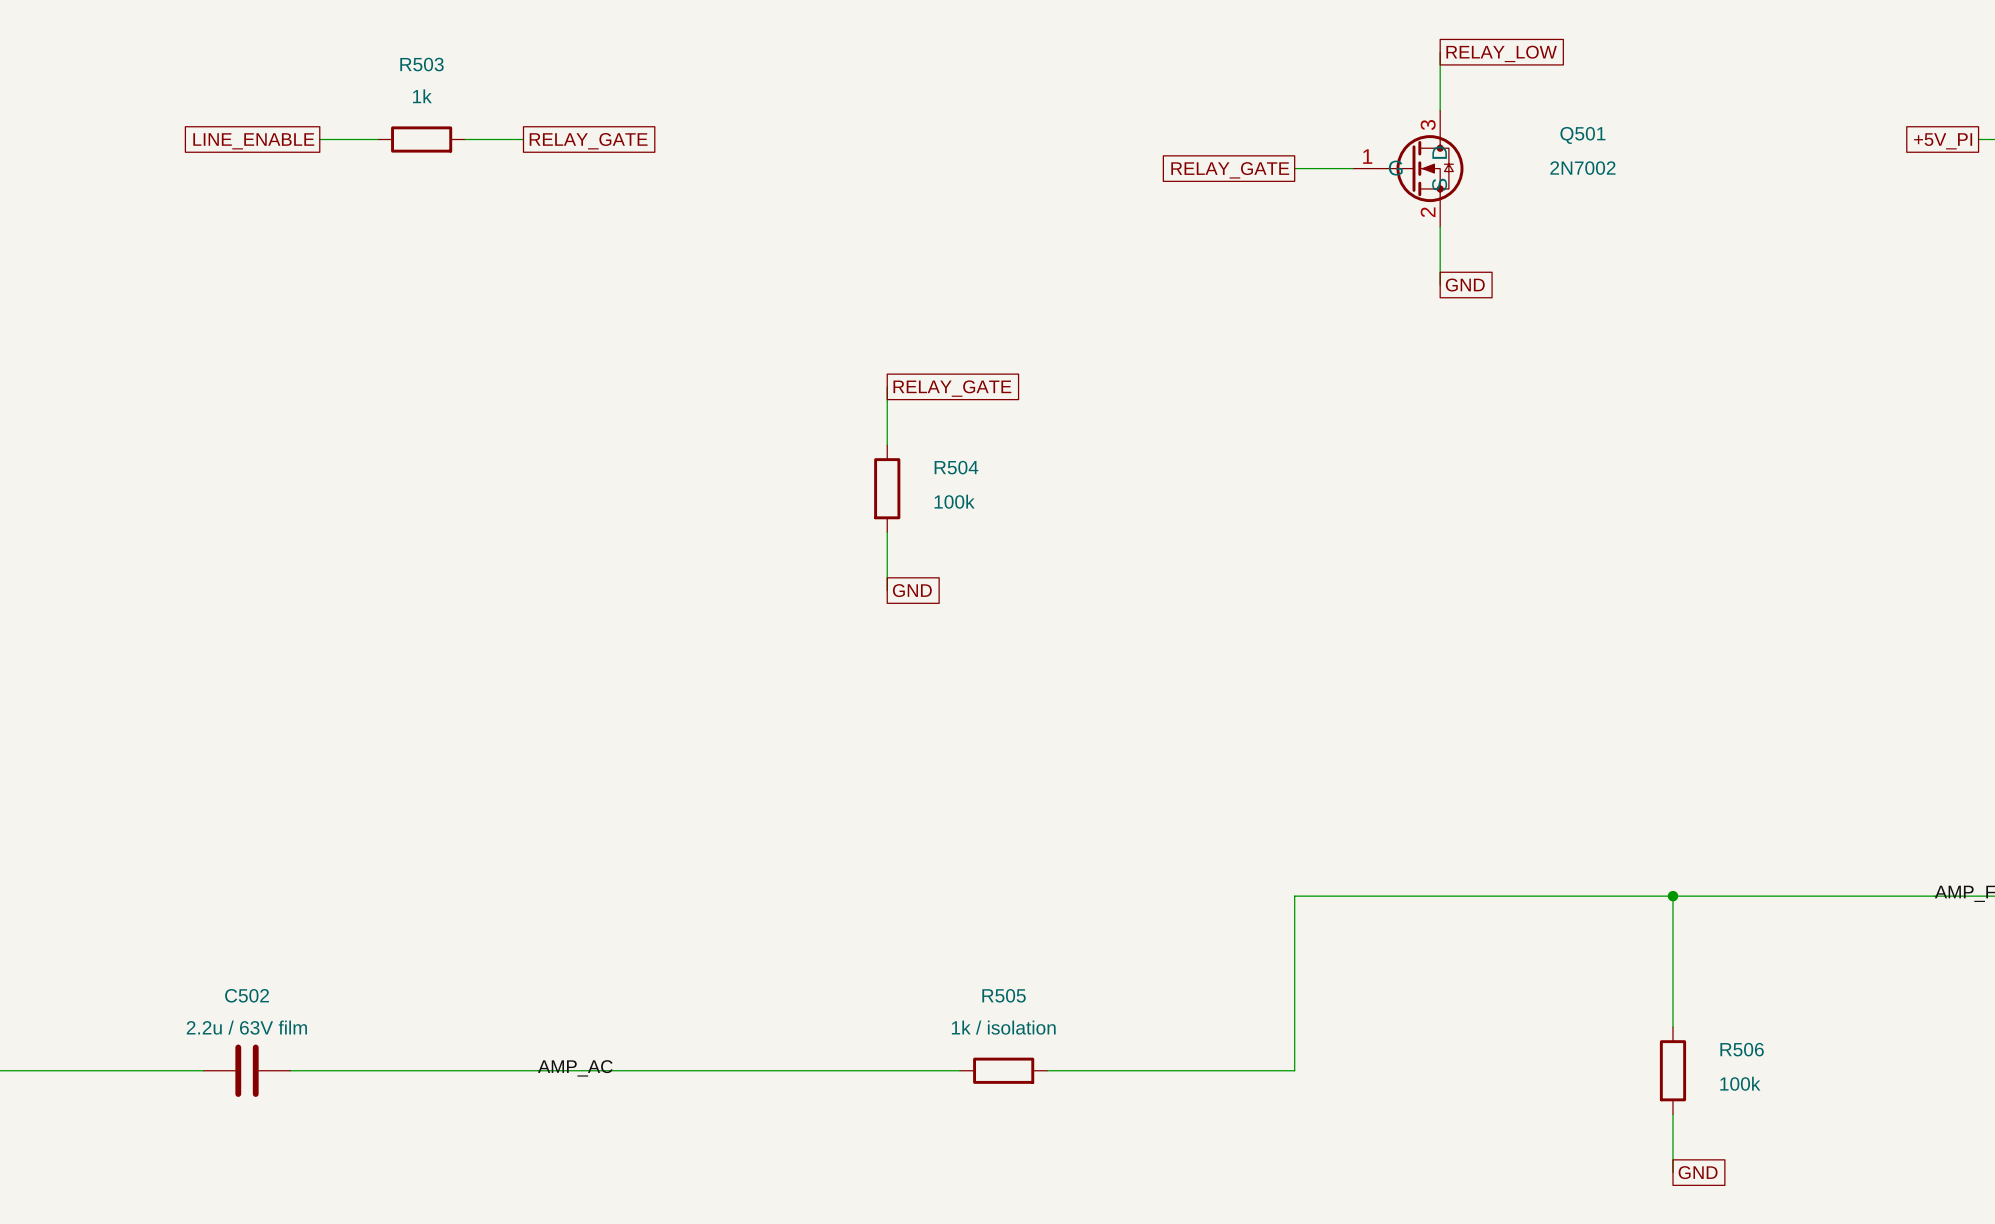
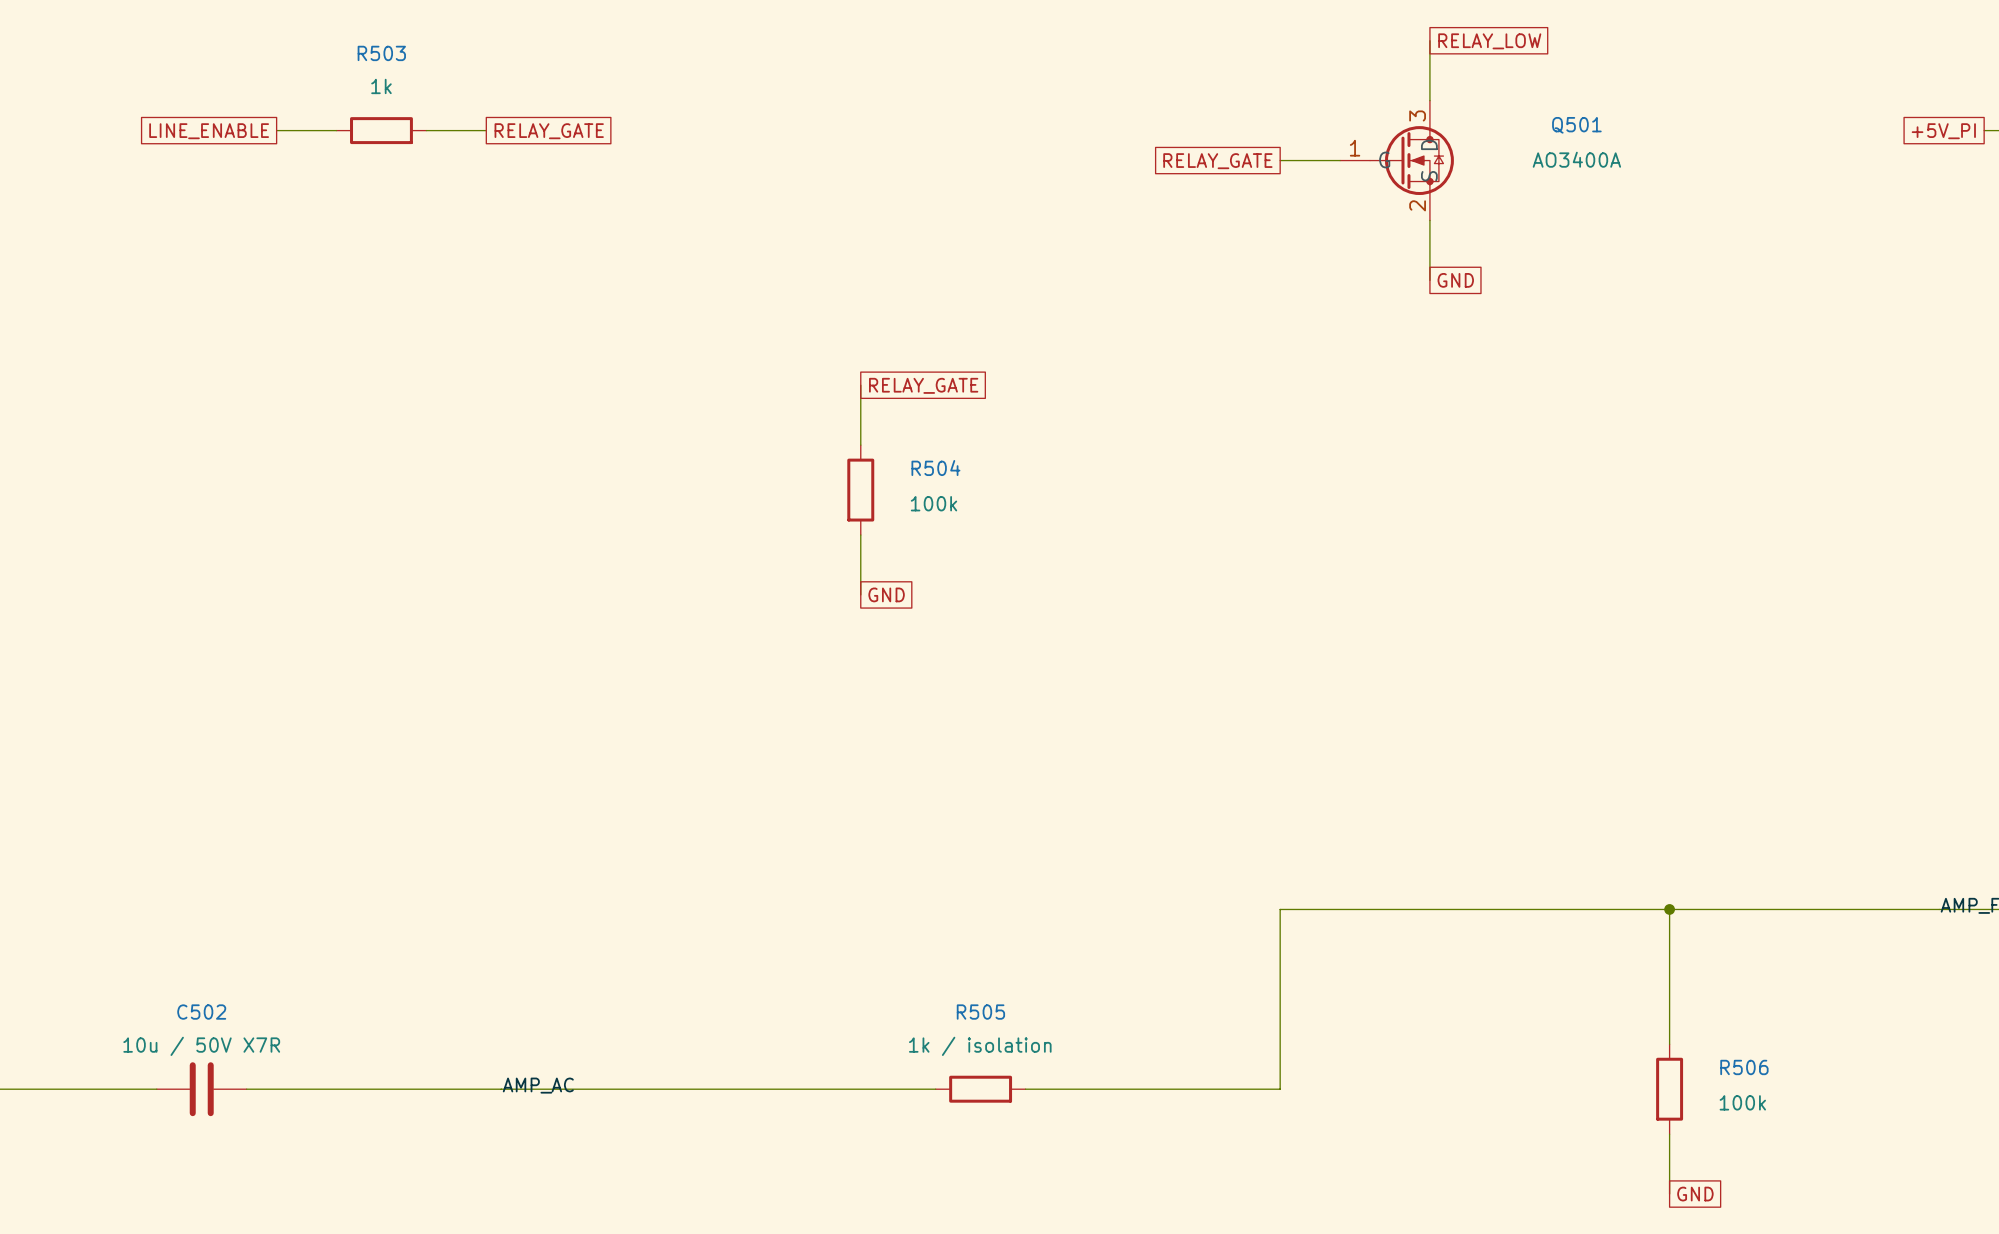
Q501 value: 2N7002 (1582, 168) -> AO3400A (1576, 159)
C502 value: 2.2u / 63V film (246, 1027) -> 10u / 50V X7R (201, 1046)

